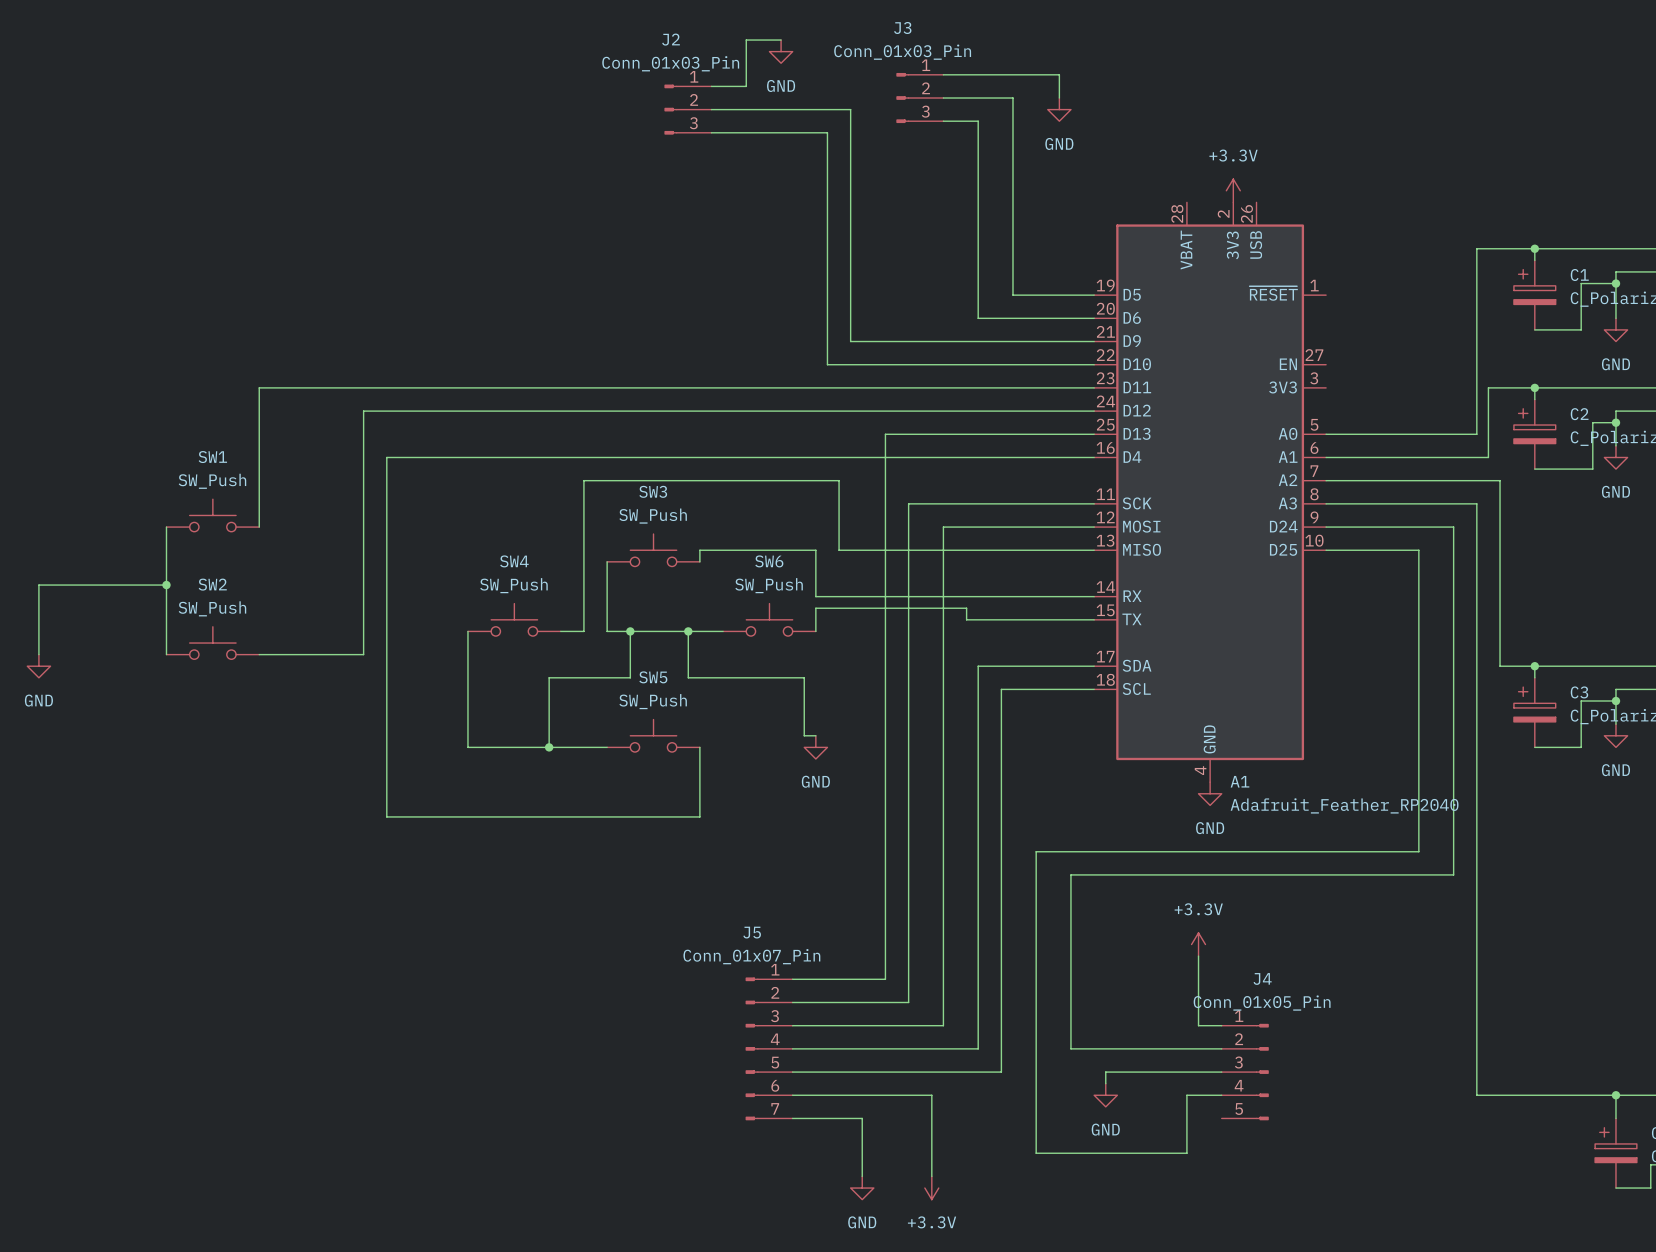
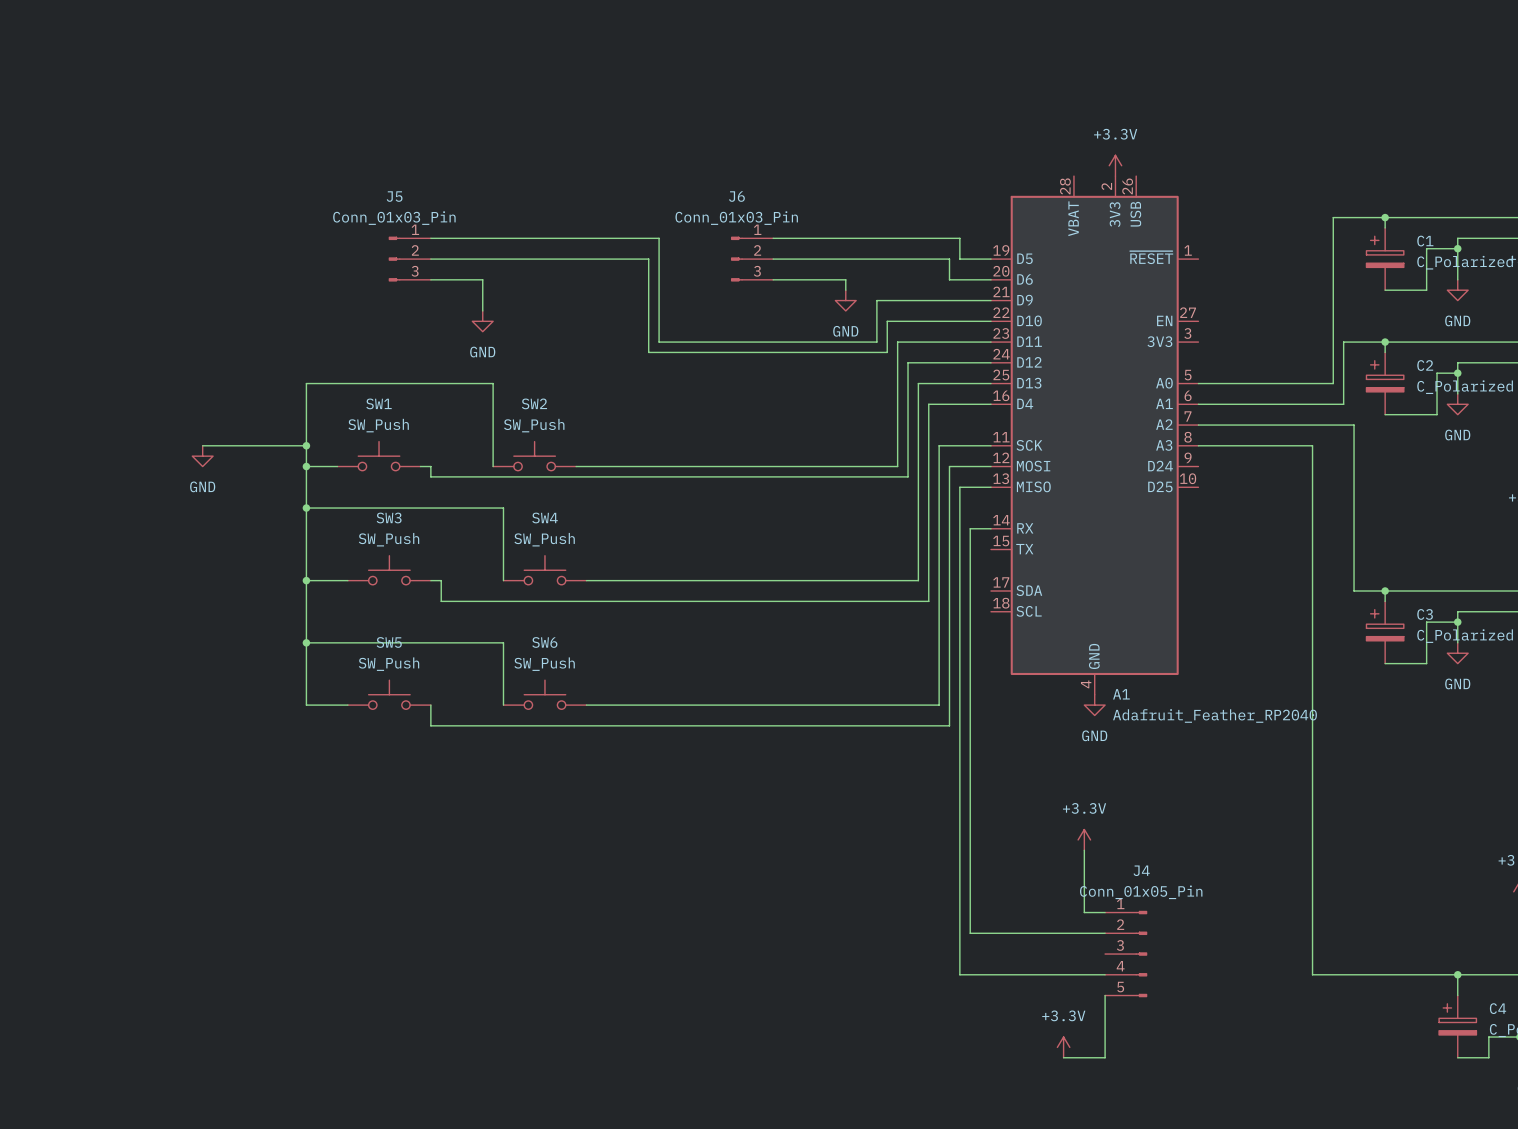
wire: (781, 40) (746, 40) (746, 86) (711, 86) -> none
power symbol: GND (781, 51) -> none
wire: (943, 74) (1059, 74) (1059, 98) -> none
J3: Conn_01x03_Pin (919, 98) -> none
wire: (943, 98) (1012, 98) (1012, 295) -> (773, 259) (918, 259)
J2: Conn_01x03_Pin (687, 109) -> none
wire: (711, 109) (850, 109) (850, 341) (966, 341) -> none
power symbol: GND (1059, 109) -> none
wire: (943, 121) (978, 121) (978, 318) (1047, 318) -> none
wire: (711, 132) (827, 132) (827, 364) (978, 364) -> (430, 259) (648, 259) (648, 352) (887, 352) (887, 321)
wire: none -> (773, 238) (959, 238) (959, 259)
J6: none -> Conn_01x03_Pin (752, 259)
wire: (1047, 295) (1059, 295) -> (949, 259) (949, 279)
wire: none -> (430, 279) (482, 279) (482, 310)
wire: none -> (773, 279) (845, 279) (845, 290)
power symbol: none -> GND (845, 300)
power symbol: none -> GND (482, 321)
wire: (723, 387) (259, 387) (259, 527) -> (659, 342) (659, 238) (430, 238)
wire: (966, 387) (989, 387) -> (876, 342) (876, 300)
wire: (1001, 411) (363, 411) (363, 654) -> (908, 362) (908, 476) (430, 476) (430, 466) (420, 466)
wire: (1012, 434) (885, 434) (885, 979) (792, 979) -> (918, 383) (918, 580) (586, 580)
wire: (1024, 457) (386, 457) (386, 816) (467, 816) -> (430, 705) (430, 725)
wire: none -> (202, 445) (306, 445)
junction: none -> (306, 445)
wire: (1036, 503) (908, 503) (908, 1002) (792, 1002) -> (939, 445) (939, 705) (586, 705)
wire: (1453, 503) (1476, 503) (1476, 1095) -> (1312, 777) (1312, 974) (1333, 974)
SW1 position: (212, 515) -> (379, 456)
power symbol: none -> GND (202, 456)
wire: (166, 527) (166, 654) -> none
wire: none -> (306, 466) (337, 466)
junction: none -> (306, 466)
wire: none -> (493, 466) (493, 383) (306, 383) (306, 705) (347, 705)
wire: (943, 527) (943, 1025) (792, 1025) -> (856, 466) (576, 466)
wire: (989, 527) (1047, 527) -> (897, 466) (897, 342)
wire: (1326, 527) (1453, 527) -> (1312, 445) (1312, 466)
SW3 position: (653, 550) -> (389, 570)
wire: (1059, 550) (839, 550) (839, 480) (583, 480) (583, 631) (560, 631) -> none
wire: (1326, 550) (1418, 550) (1418, 851) (1036, 851) (1036, 1153) (1186, 1153) (1186, 1095) -> (959, 487) (959, 974) (1073, 974)
wire: (607, 561) (607, 631) (723, 631) -> none
wire: (699, 561) (699, 550) (815, 550) (815, 596) (1070, 596) -> none
wire: none -> (306, 508) (503, 508) (503, 580)
junction: none -> (306, 508)
wire: (166, 585) (38, 585) (38, 654) -> none
junction: (166, 585) -> none
SW4 position: (514, 619) -> (544, 570)
SW6 position: (769, 619) -> (544, 694)
wire: (1094, 619) (966, 619) (966, 608) (815, 608) (815, 631) -> none
wire: (467, 631) (467, 747) (607, 747) -> none
wire: (630, 631) (630, 677) -> (627, 601) (576, 601)
junction: (630, 631) -> none
wire: (688, 631) (688, 677) -> (503, 663) (503, 705)
junction: (688, 631) -> none
SW2 position: (212, 643) -> (534, 456)
wire: (259, 654) (328, 654) -> none
junction: none -> (306, 580)
wire: none -> (337, 580) (347, 580)
power symbol: GND (38, 666) -> none
wire: (1094, 666) (978, 666) (978, 1048) (792, 1048) -> none
wire: (549, 677) (549, 724) -> (503, 601) (441, 601) (441, 580) (430, 580)
wire: (804, 677) (804, 735) (815, 735) -> (731, 601) (928, 601) (928, 404)
wire: (1094, 689) (1001, 689) (1001, 1072) (792, 1072) -> none
wire: none -> (306, 642) (503, 642)
junction: none -> (306, 642)
SW5 position: (653, 735) -> (389, 694)
junction: (549, 747) -> none
wire: (699, 747) (699, 816) -> (949, 466) (949, 725) (638, 725)
power symbol: GND (815, 747) -> none
wire: (1070, 874) (1453, 874) -> (970, 777) (970, 528)
J5 name position: J5 (752, 932) -> J5 (394, 196)
J5 value: Conn_01x07_Pin (751, 956) -> Conn_01x03_Pin (394, 218)
J5 symbol: [745, 977, 793, 1121] -> [388, 236, 431, 282]
wire: (1221, 1072) (1105, 1072) (1105, 1083) -> none
wire: (792, 1095) (931, 1095) (931, 1176) -> none
power symbol: GND (1105, 1095) -> none
wire: (792, 1118) (862, 1118) (862, 1176) -> none
wire: none -> (1105, 995) (1105, 1057) (1063, 1057)
power symbol: none -> +3.3V (1063, 1047)
power symbol: GND (862, 1188) -> none
power symbol: +3.3V (931, 1188) -> none

